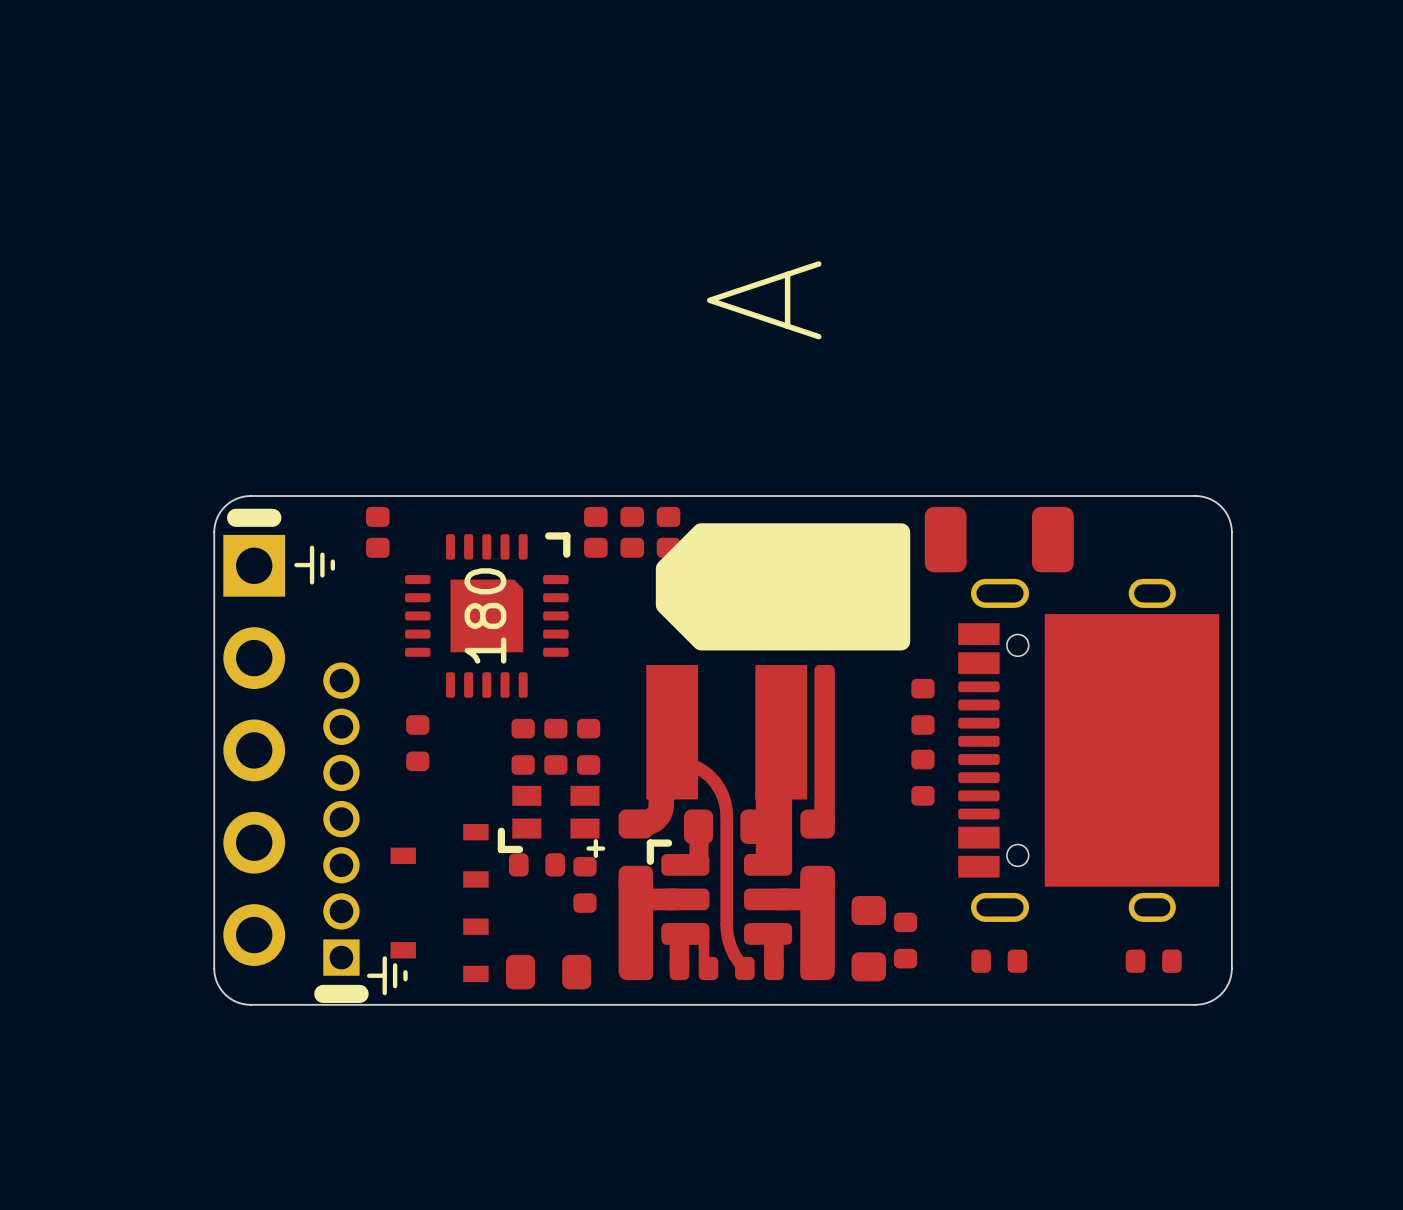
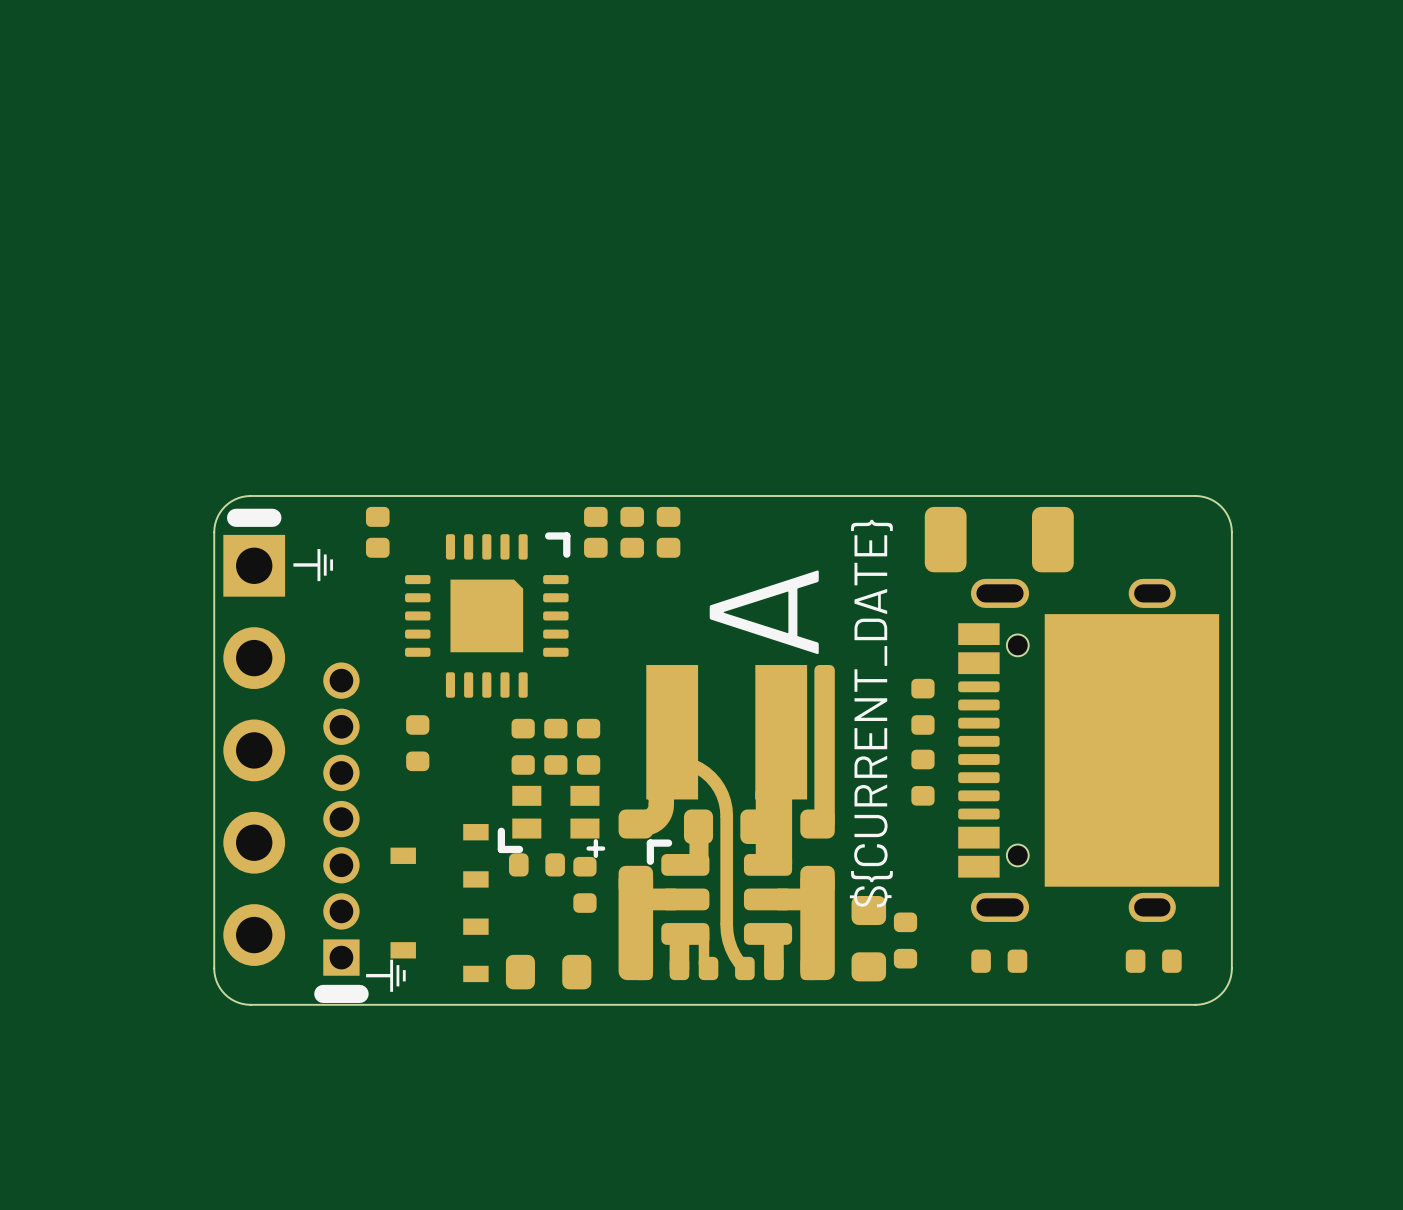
text position: A (764, 300) -> A (764, 612)
part: (783, 586) -> none
part text: 180 (485, 615) -> none
text: none -> ${CURRENT_DATE} (871, 713)

